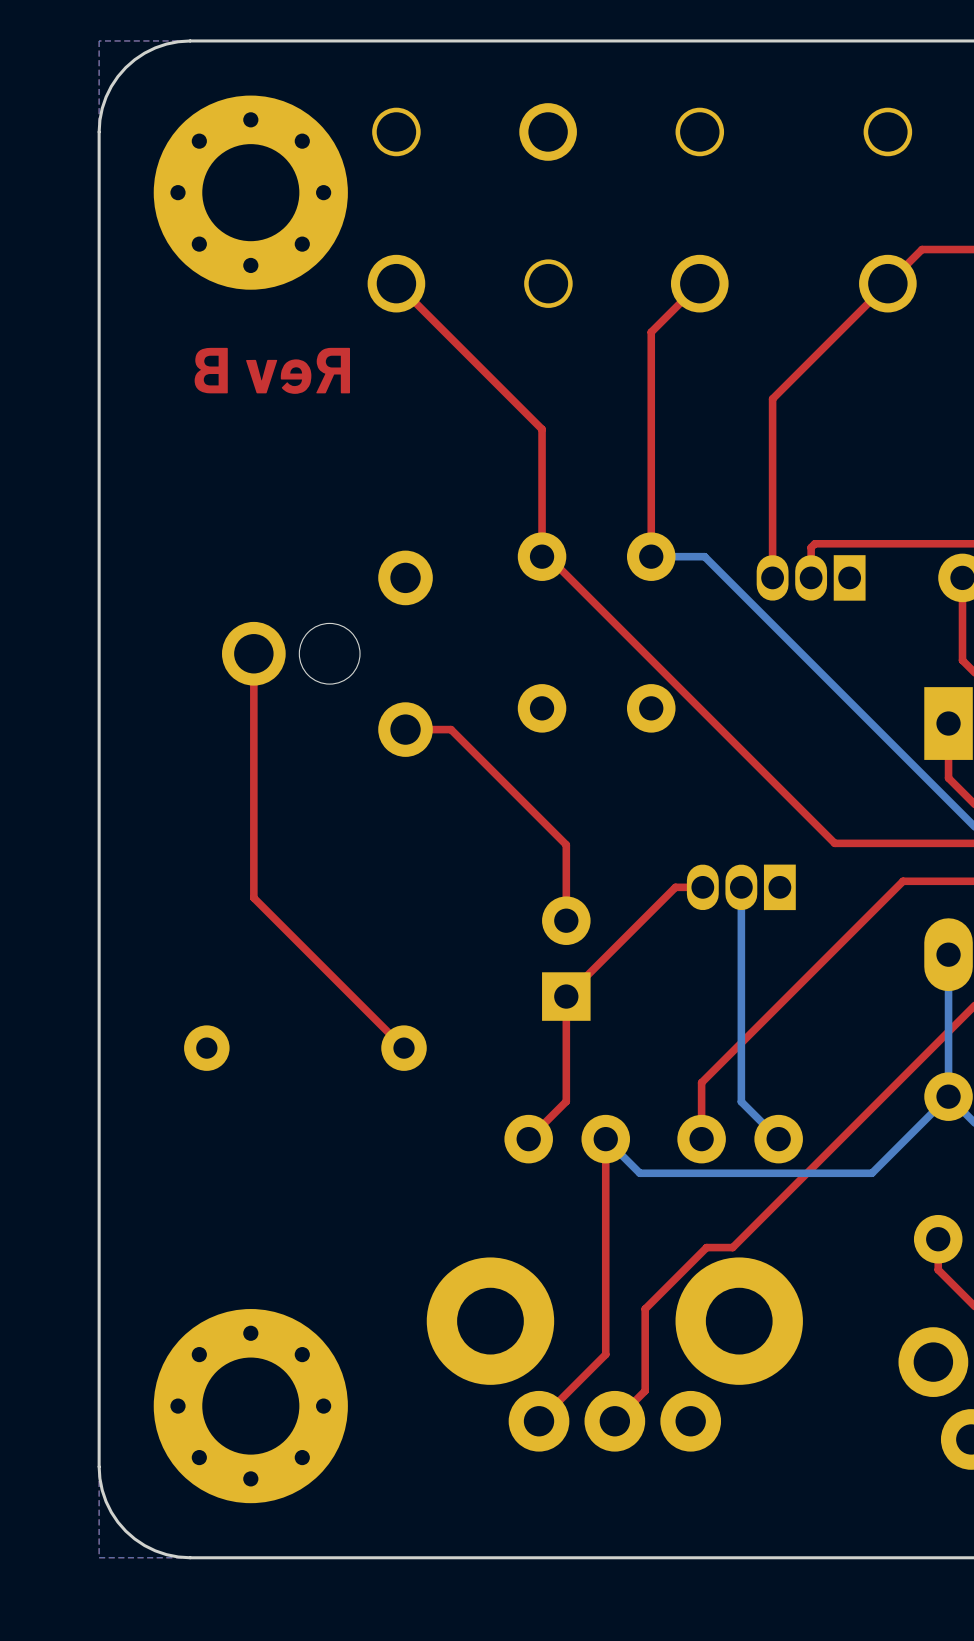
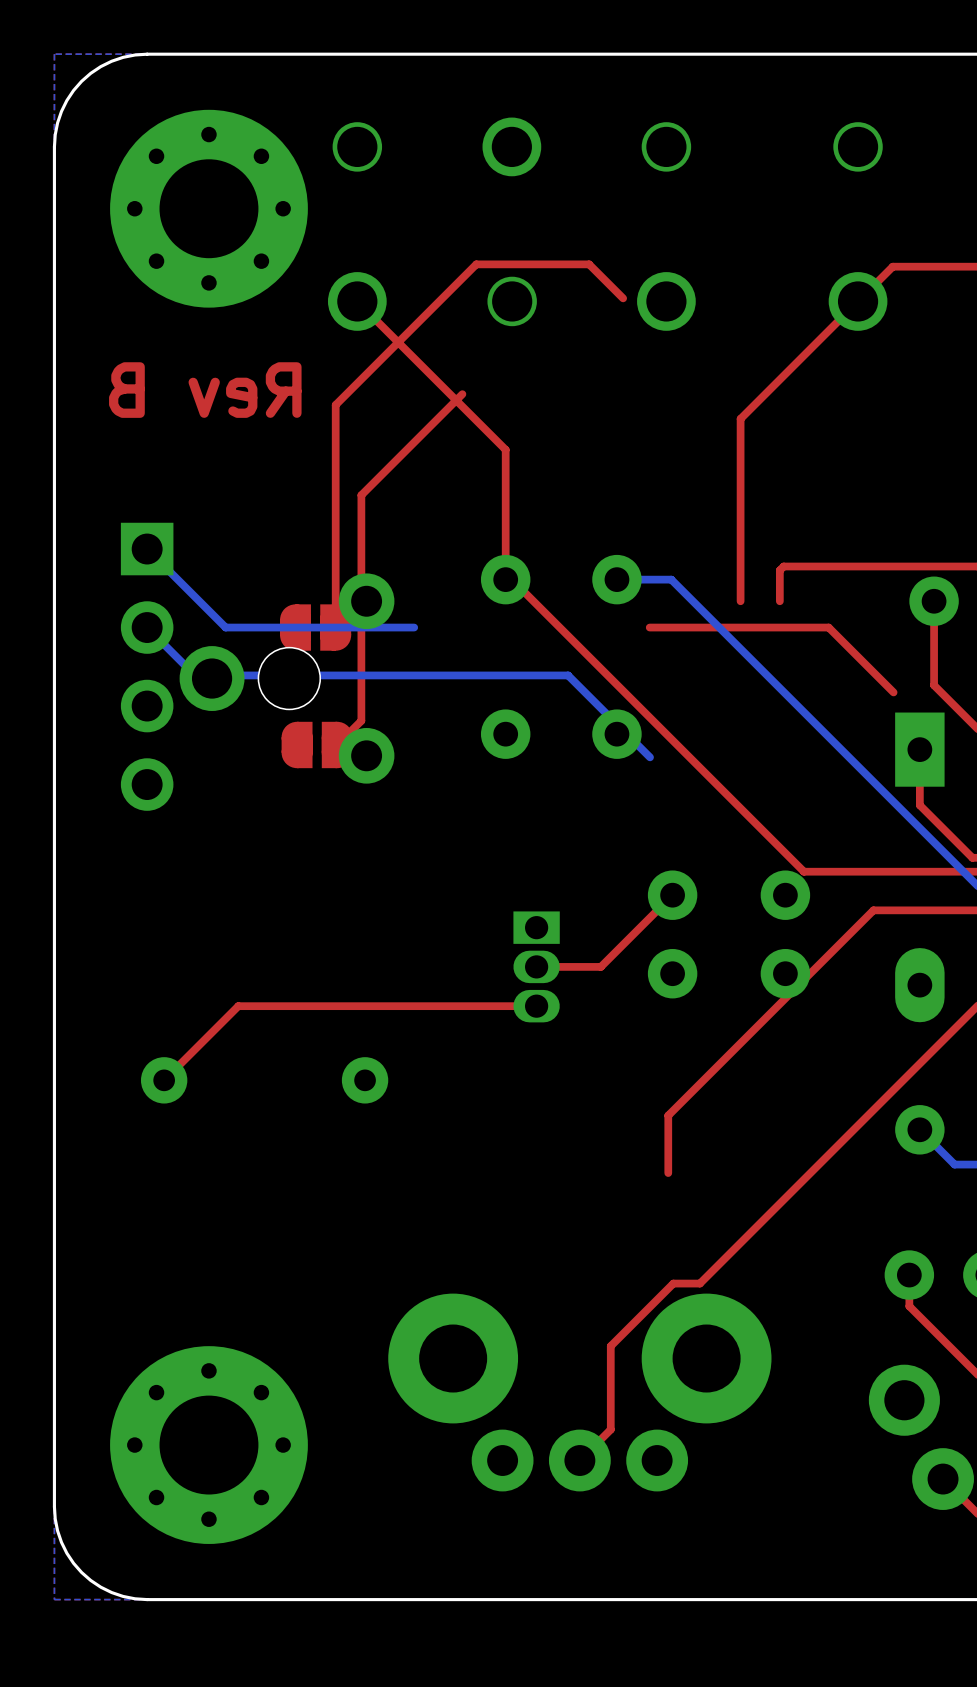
top track: none -> (623, 298) (589, 264) (476, 264) (335, 405) (335, 627)
top track: (699, 283) (651, 332) (651, 556) -> none
top track: none -> (462, 394) (361, 495) (361, 720) (337, 744)
bottom track: none -> (147, 549) (225, 627) (414, 627)
part: (811, 577) -> none
bottom track: none -> (147, 627) (195, 675) (568, 675) (650, 757)
part: none -> (315, 627)
top track: none -> (649, 627) (828, 627) (893, 692)
part: none -> (147, 666)
top track: (253, 653) (253, 897) (404, 1048) -> none
part: none -> (317, 744)
top track: (405, 729) (451, 729) (566, 844) (566, 920) -> none
top track: none -> (672, 895) (600, 966) (536, 966)
top track: (702, 887) (675, 887) (566, 996) (566, 1101) (528, 1139) -> none
bottom track: (741, 887) (741, 1101) (778, 1139) -> none
part: (741, 887) -> none
part footprint: [542, 896, 591, 1021] -> [513, 911, 560, 1023]
part: none -> (672, 934)
part: none -> (785, 934)
bottom track: (948, 954) (948, 1096) (871, 1173) (639, 1173) (605, 1139) -> none
top track: none -> (536, 1006) (238, 1006) (164, 1080)
part: (567, 1139) -> none
top track: (605, 1139) (605, 1354) (539, 1421) -> none
part: (740, 1139) -> none

